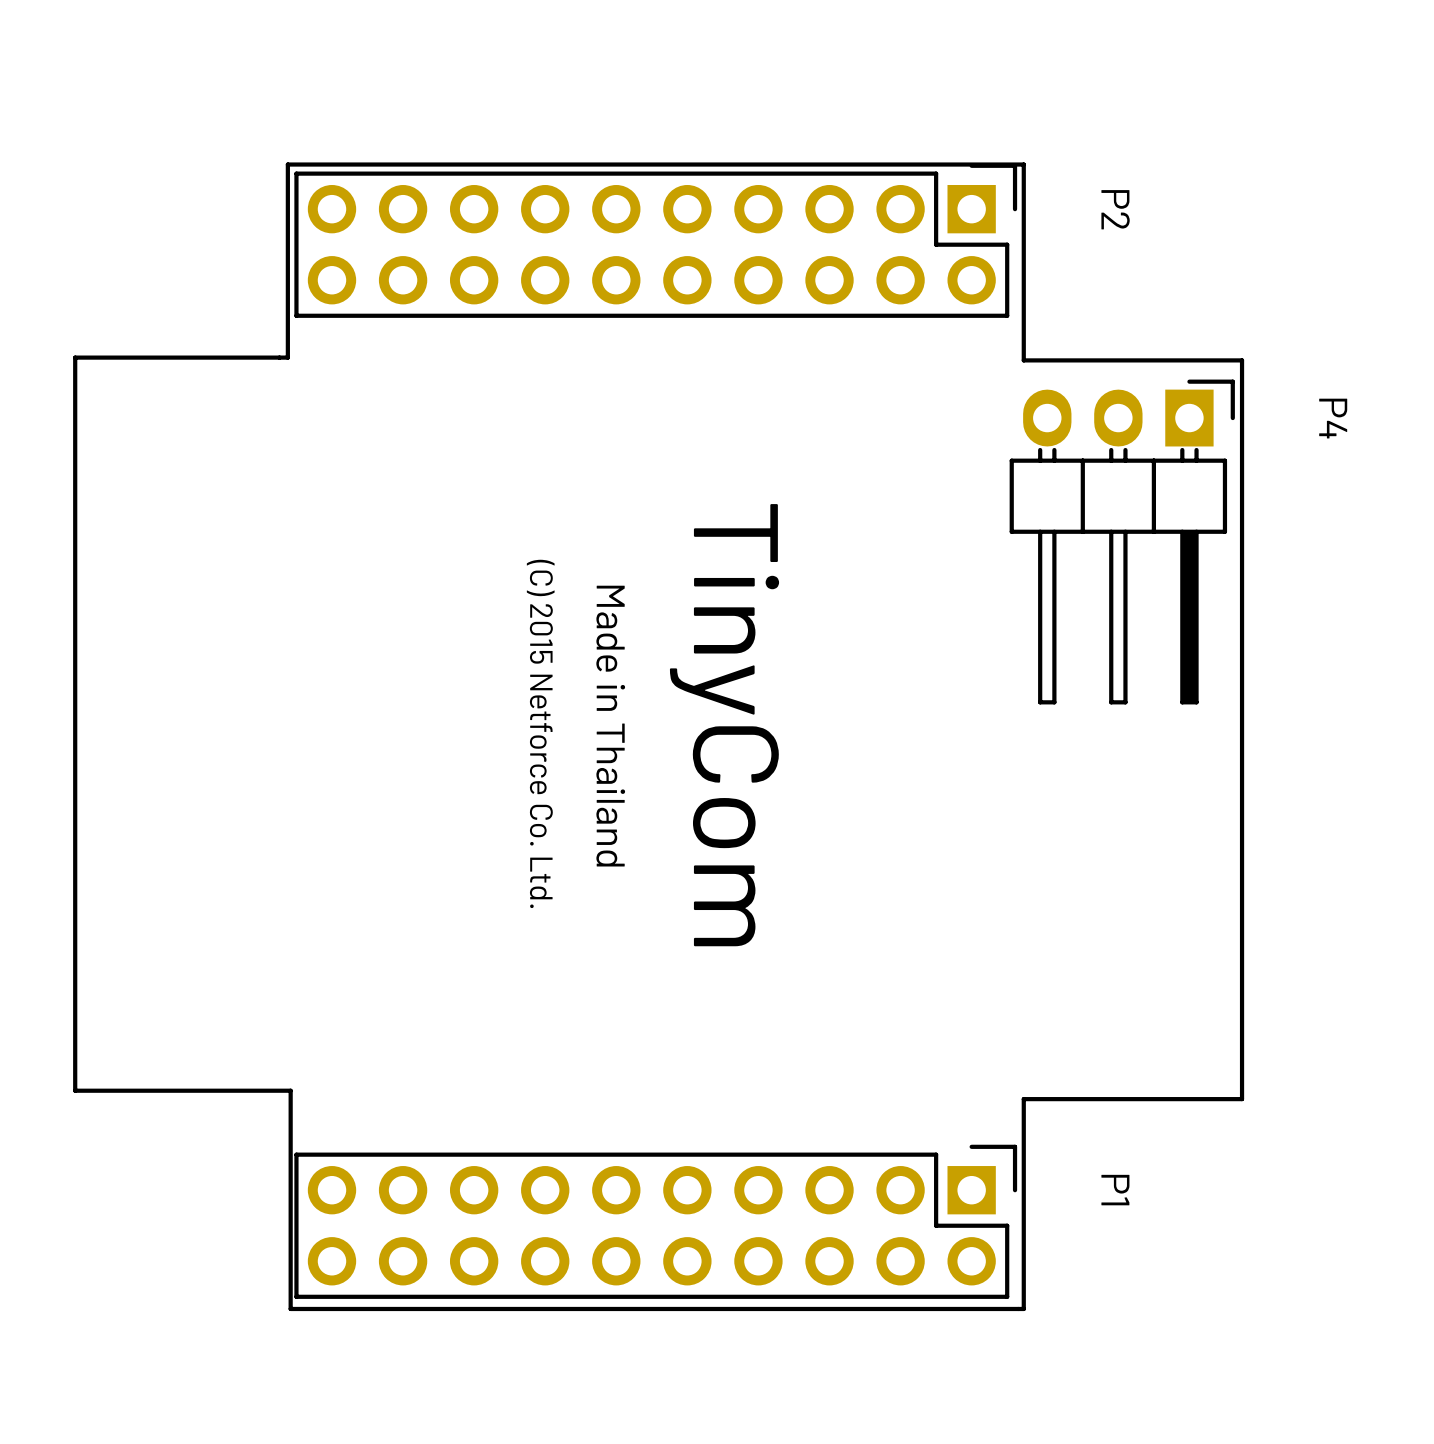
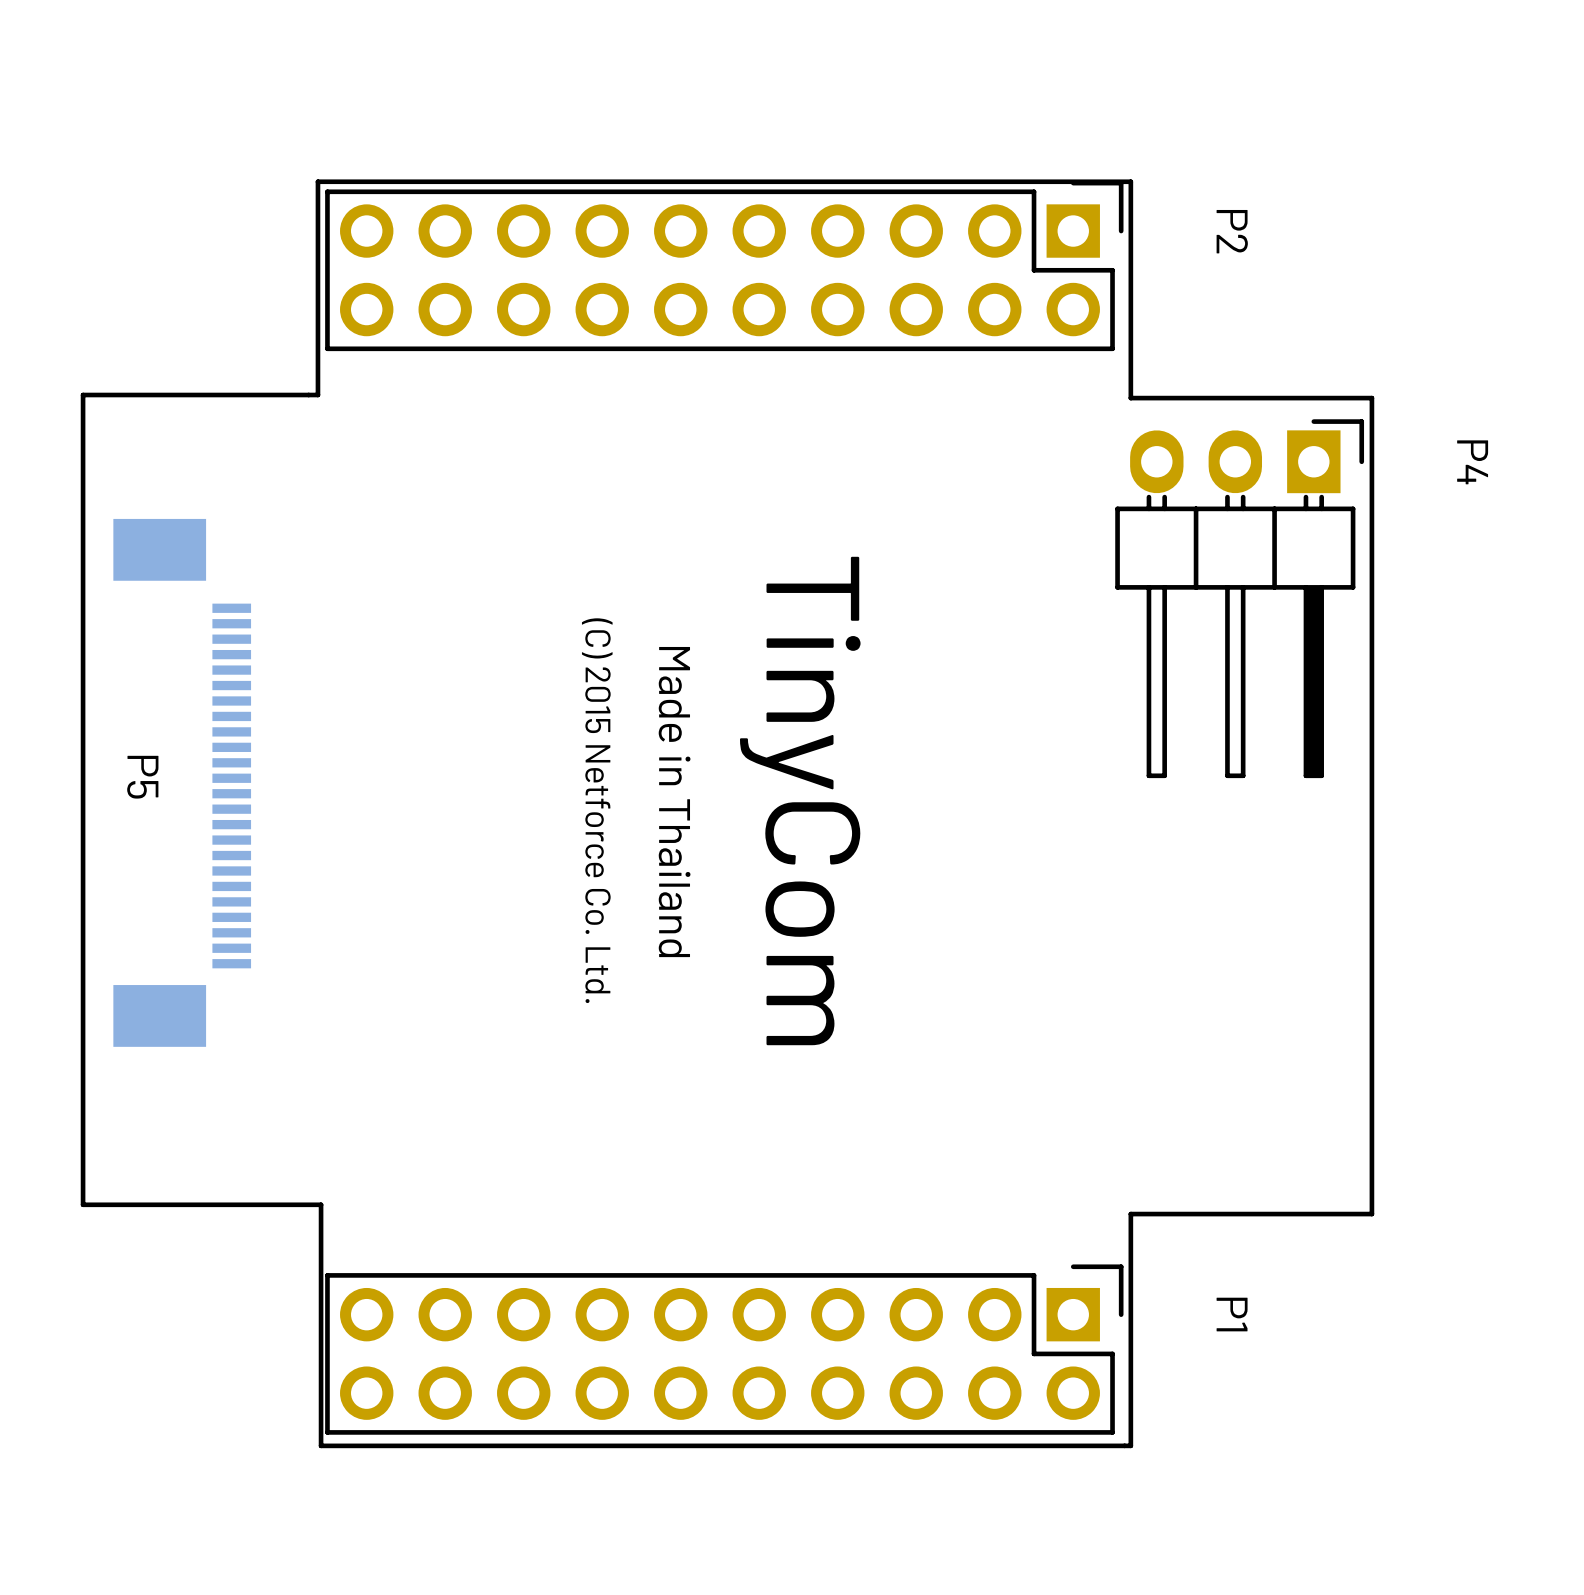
P5: none -> (182, 782)

